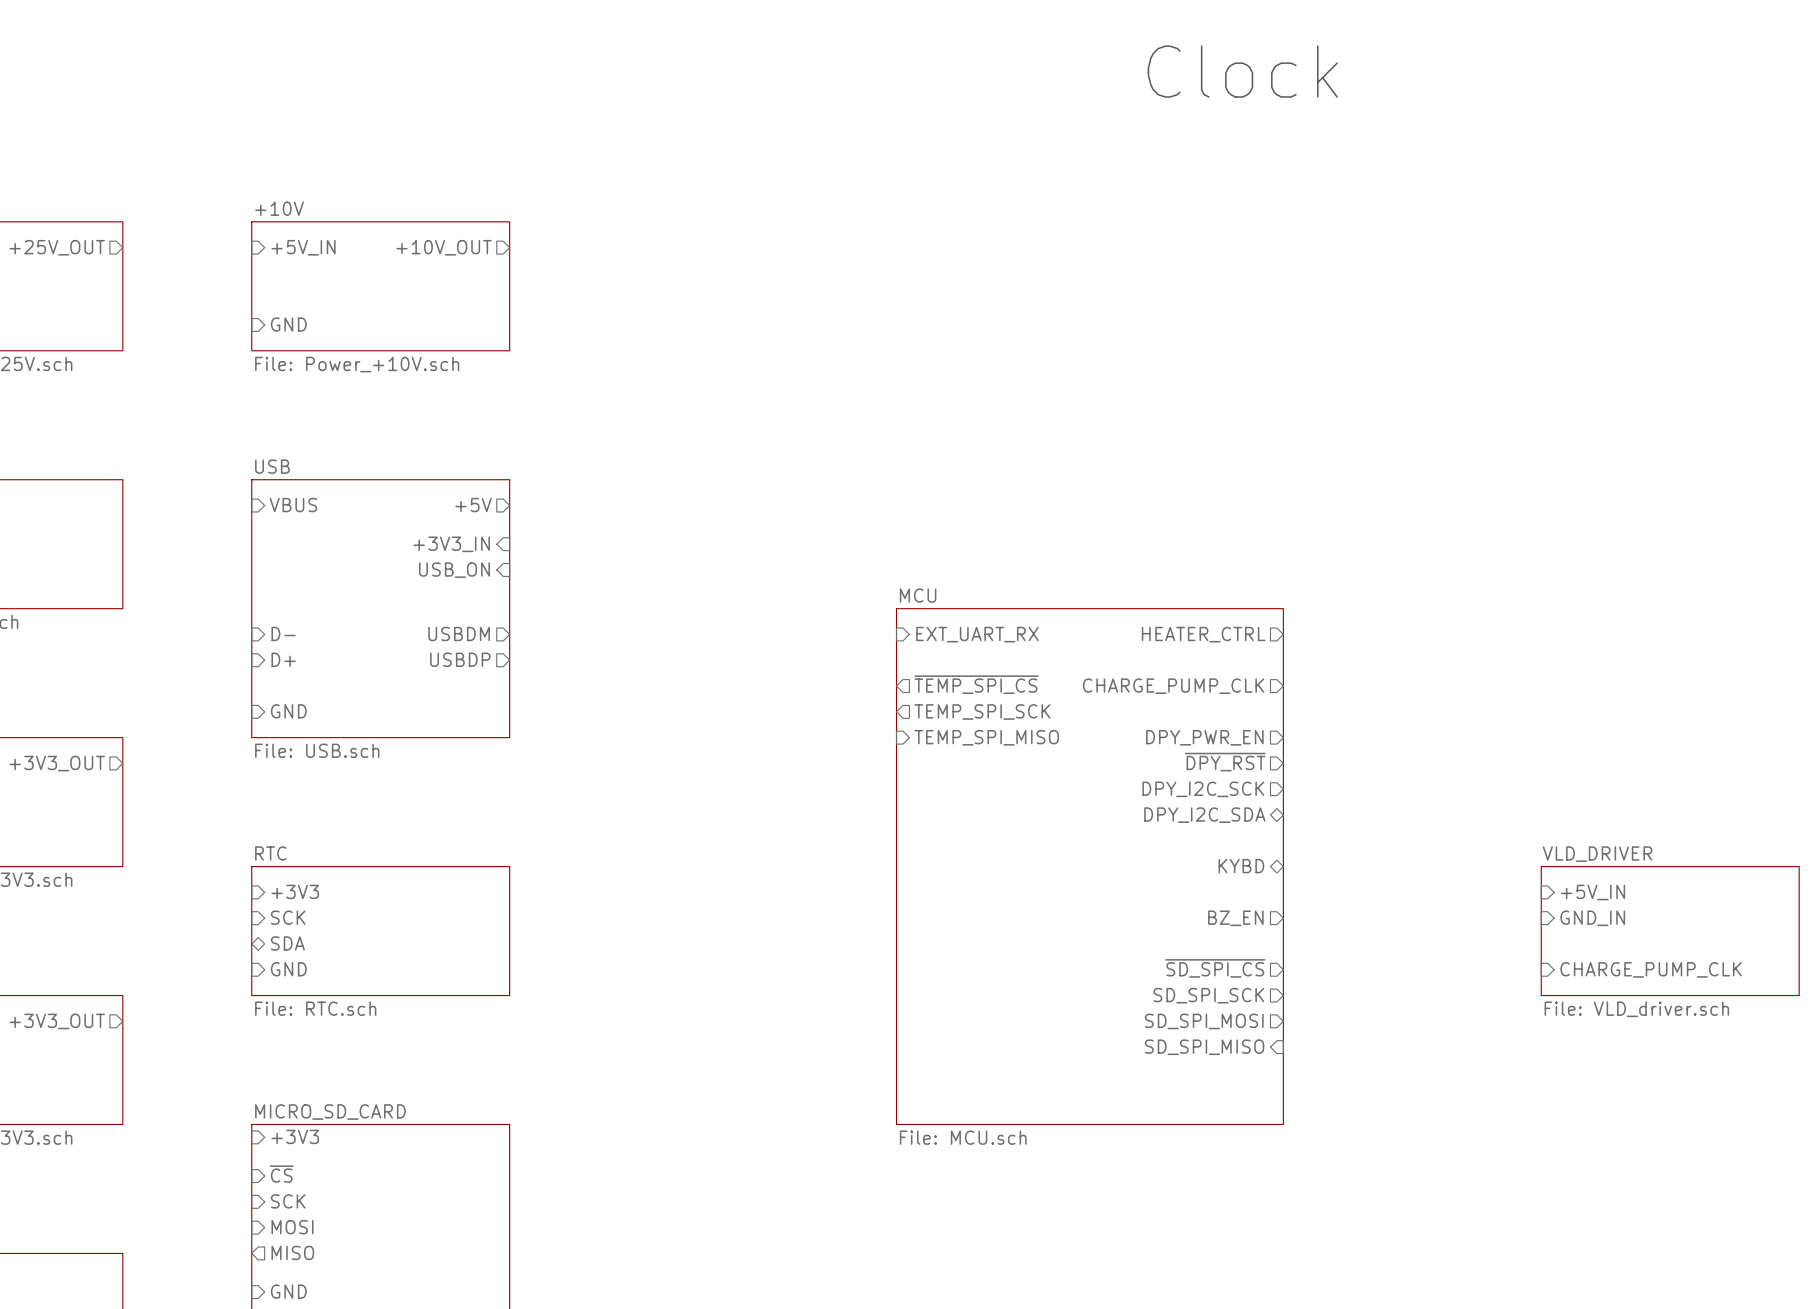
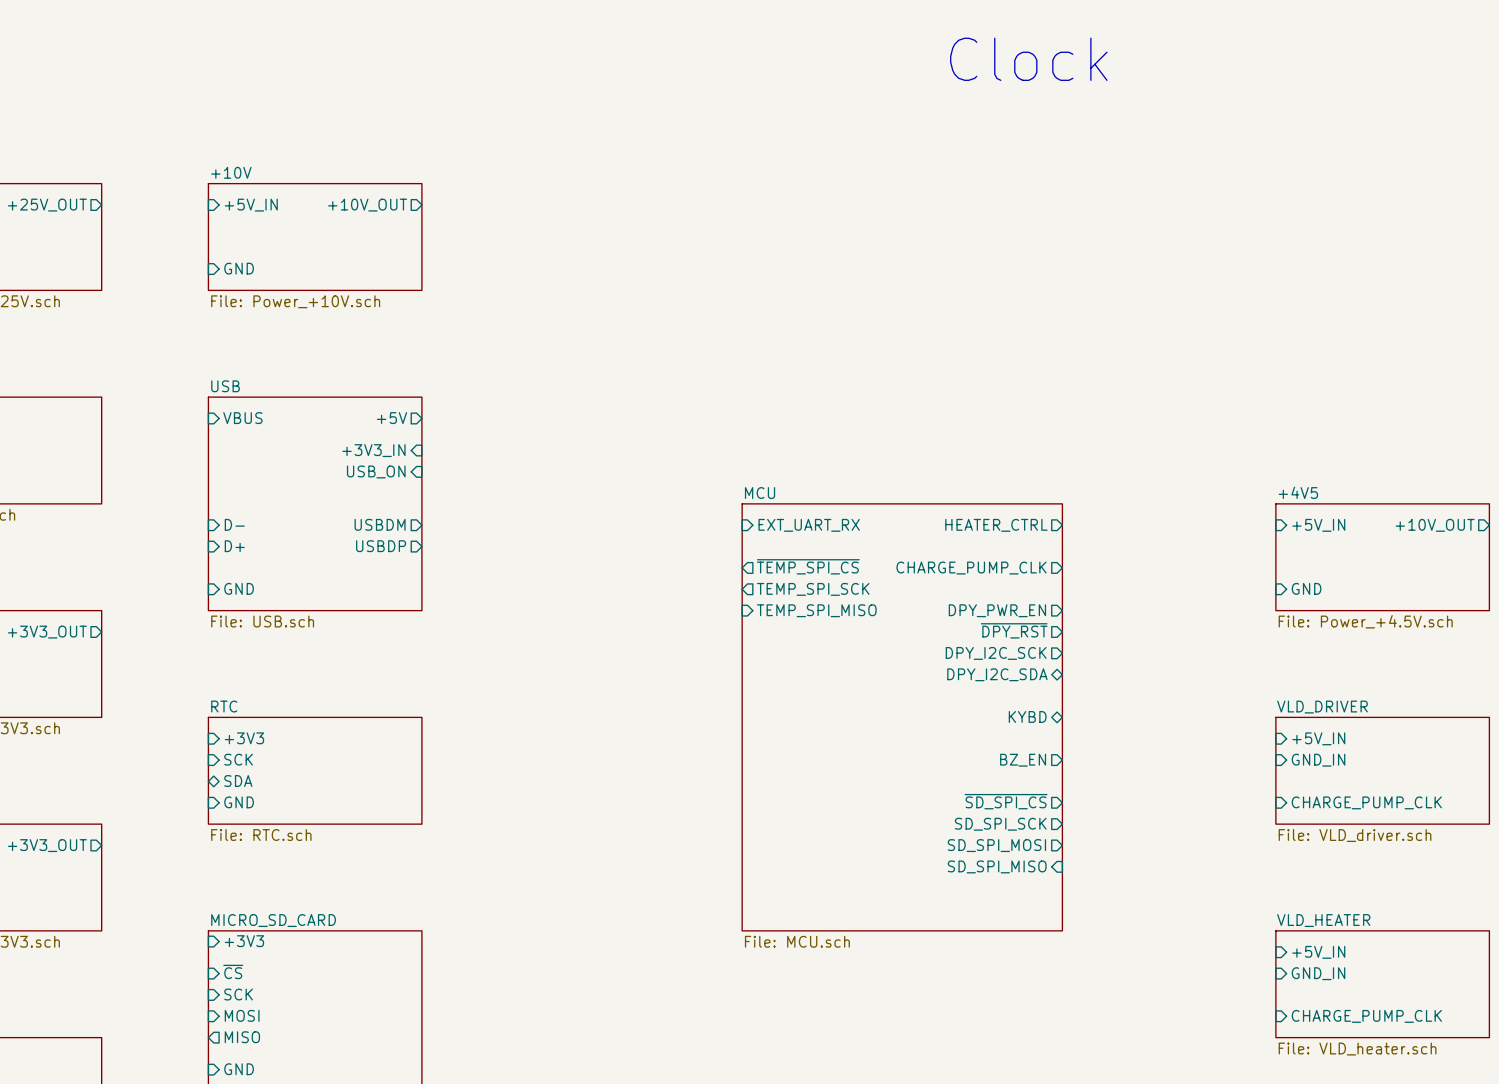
sheet pin: none -> +5V_IN (1318, 525)
sheet pin: none -> +10V_OUT (1435, 525)
sheet +4V5: none -> File: Power_+4.5V.sch (1382, 557)
sheet pin: none -> GND (1306, 588)
sheet pin: none -> +5V_IN (1318, 952)
sheet pin: none -> GND_IN (1318, 973)
sheet VLD_HEATER: none -> File: VLD_heater.sch (1382, 984)
sheet pin: none -> CHARGE_PUMP_CLK (1366, 1016)

